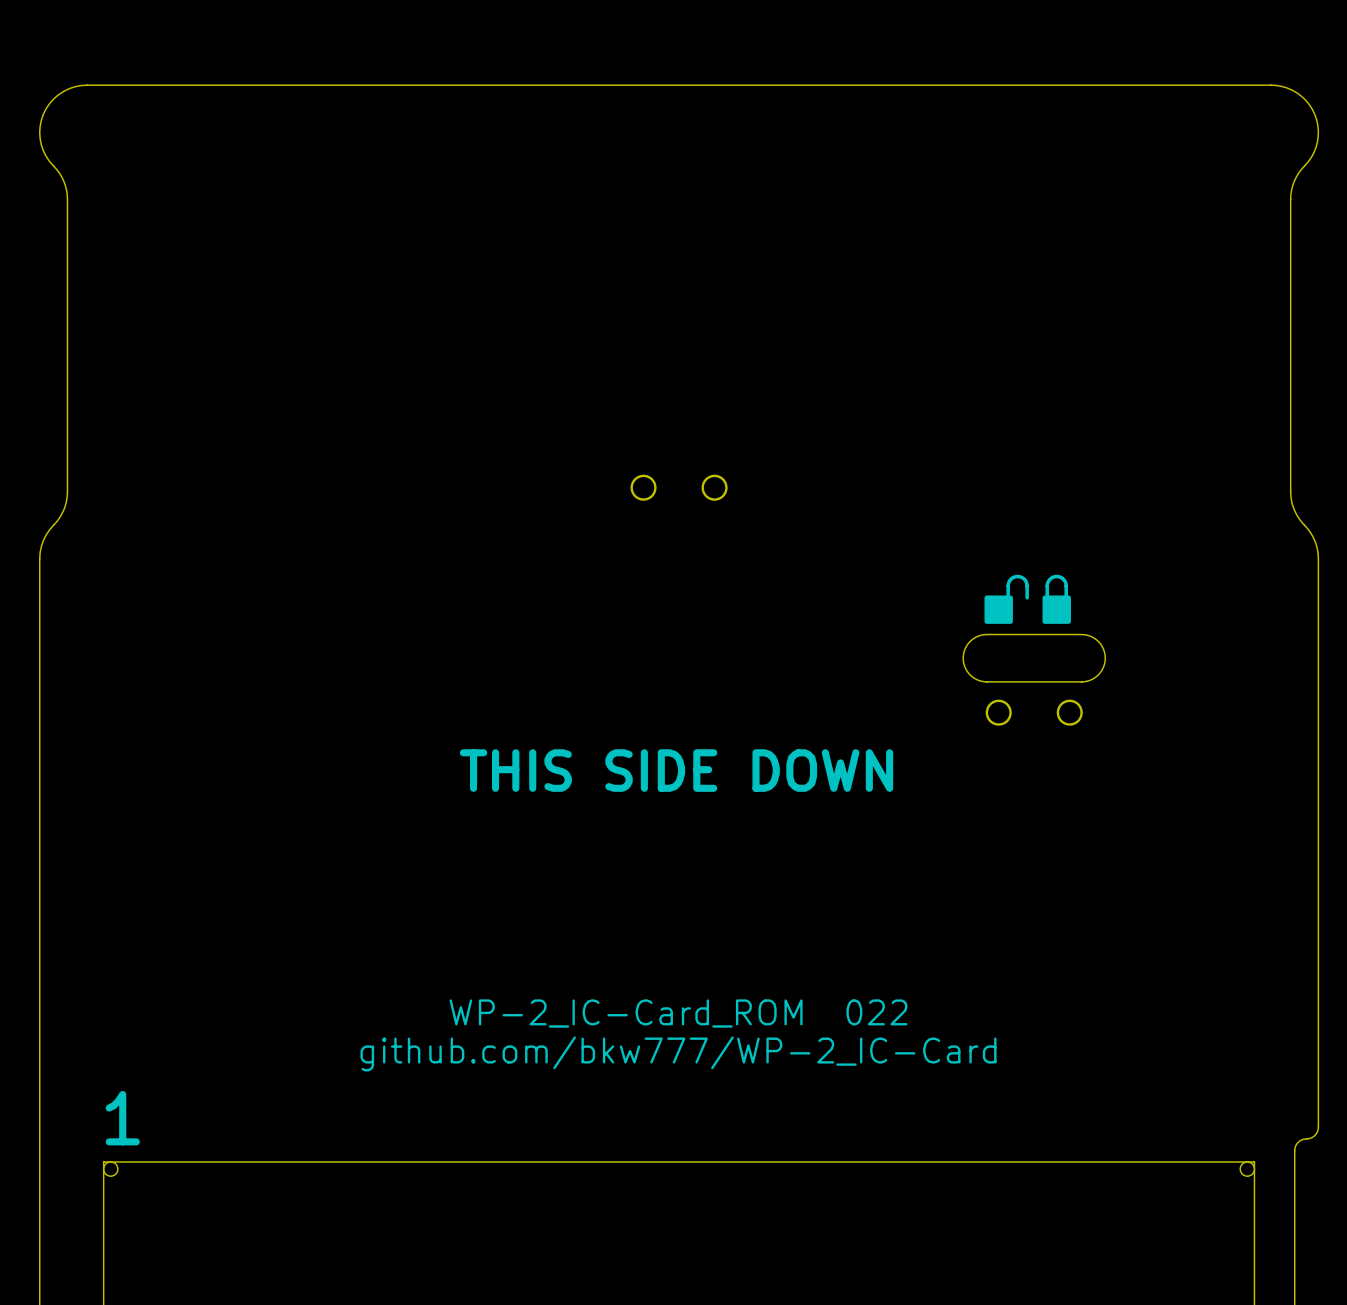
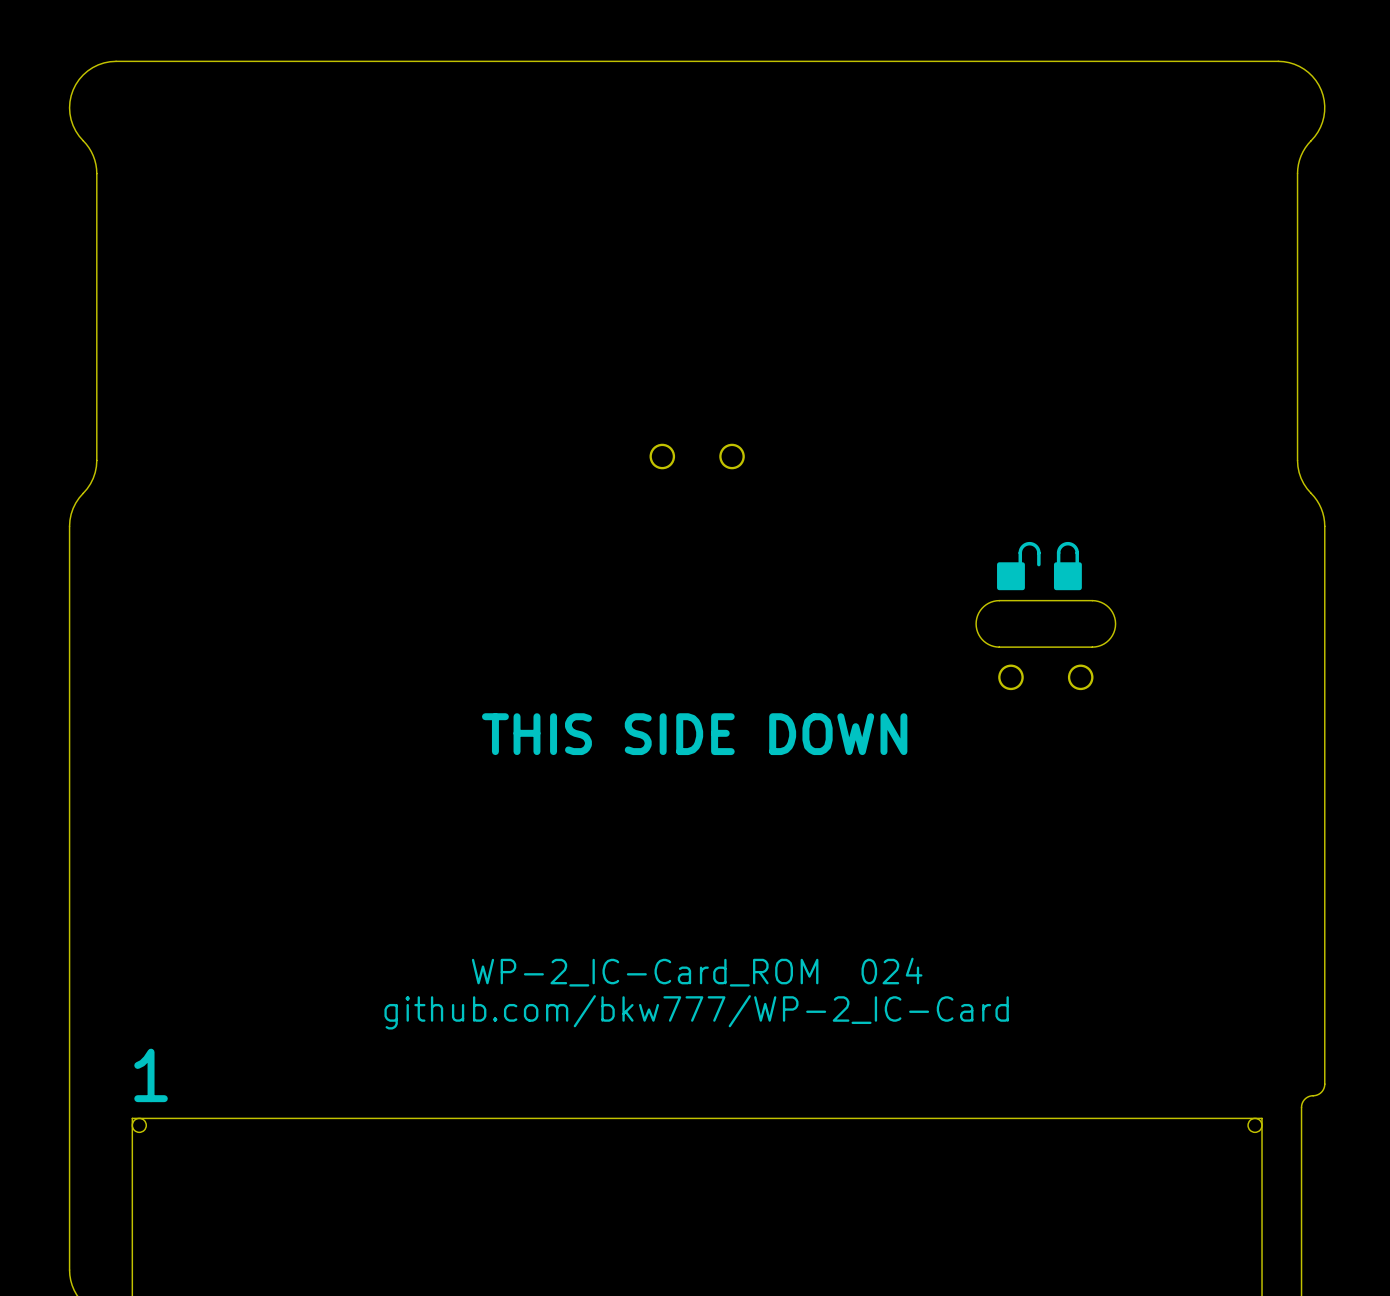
text: WP-2_IC-Card_ROM 022 (678, 1013) -> WP-2_IC-Card_ROM 024 (697, 972)

